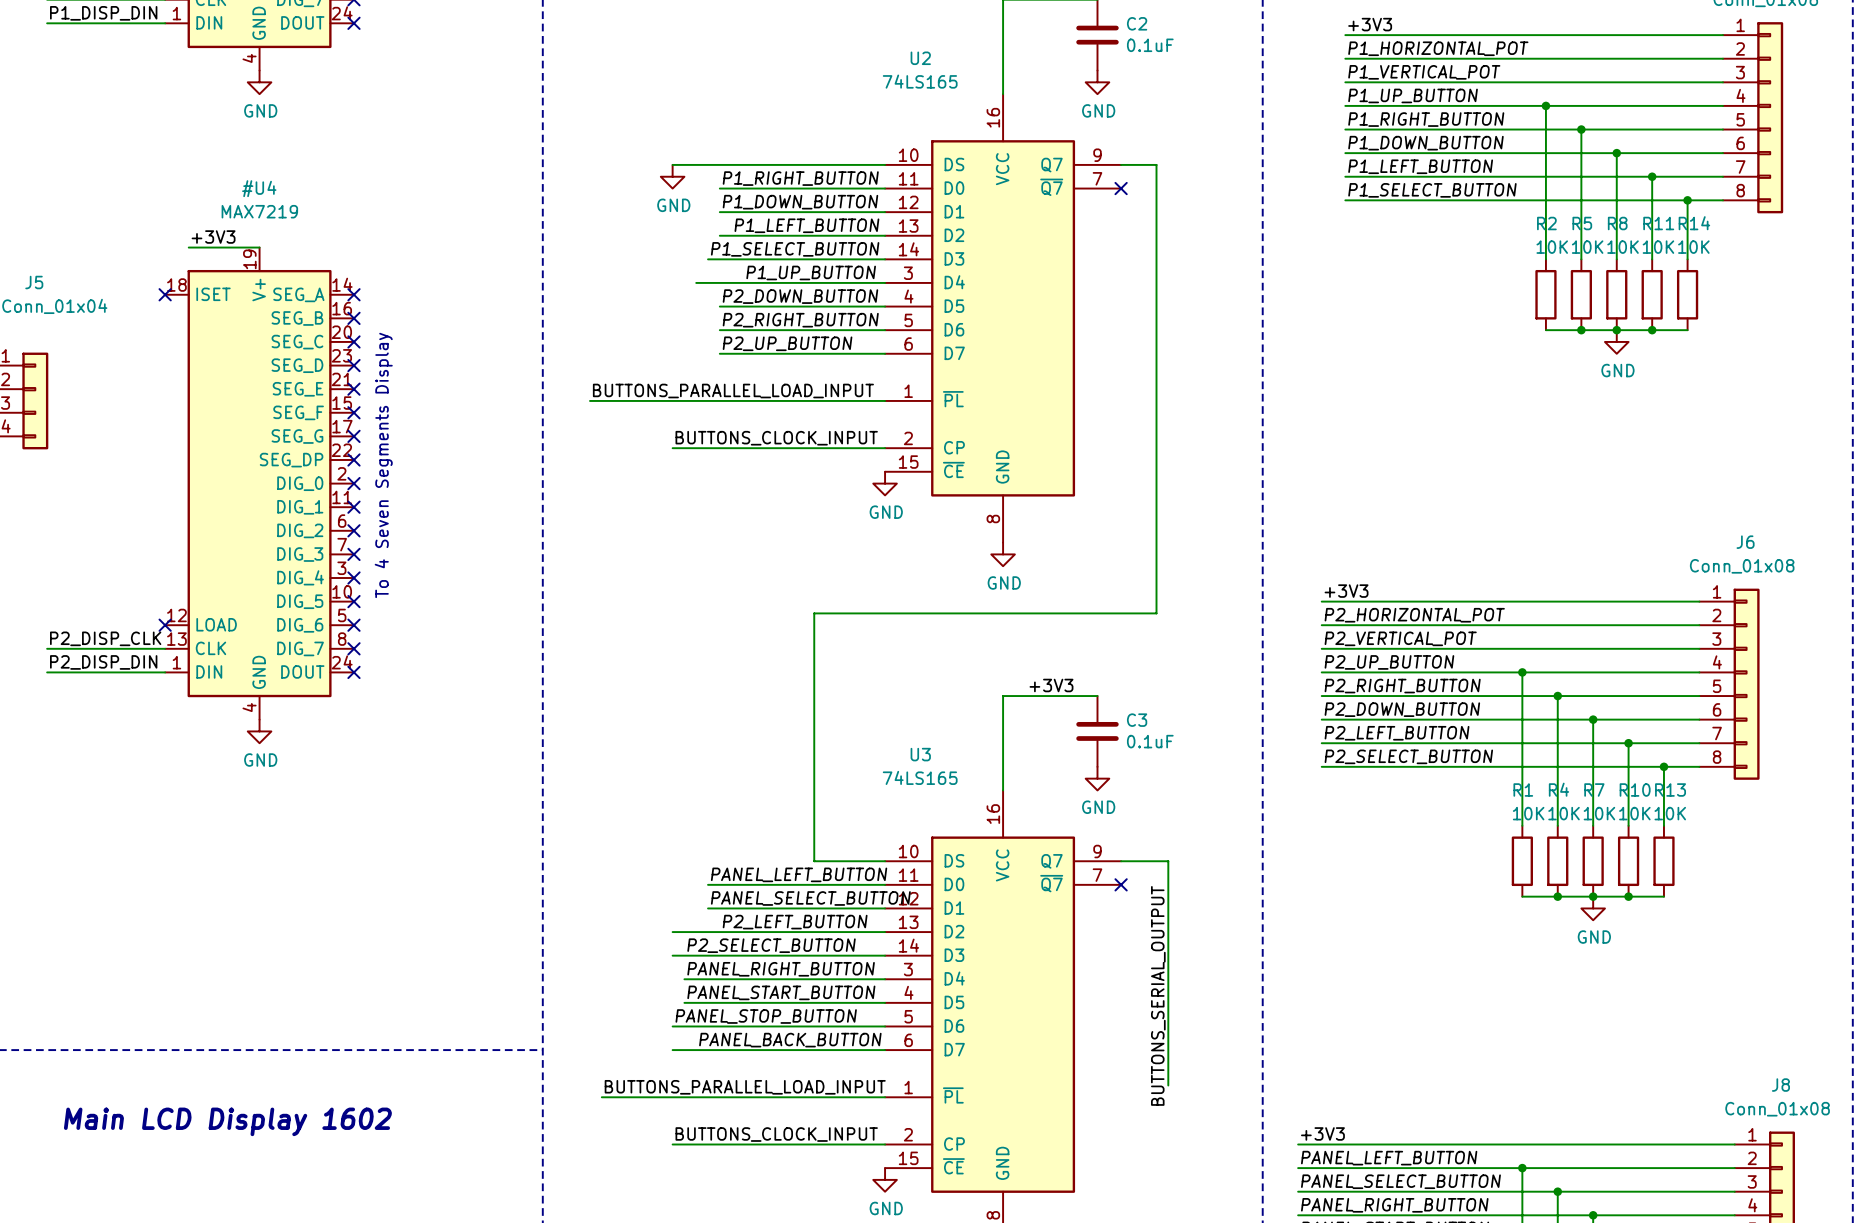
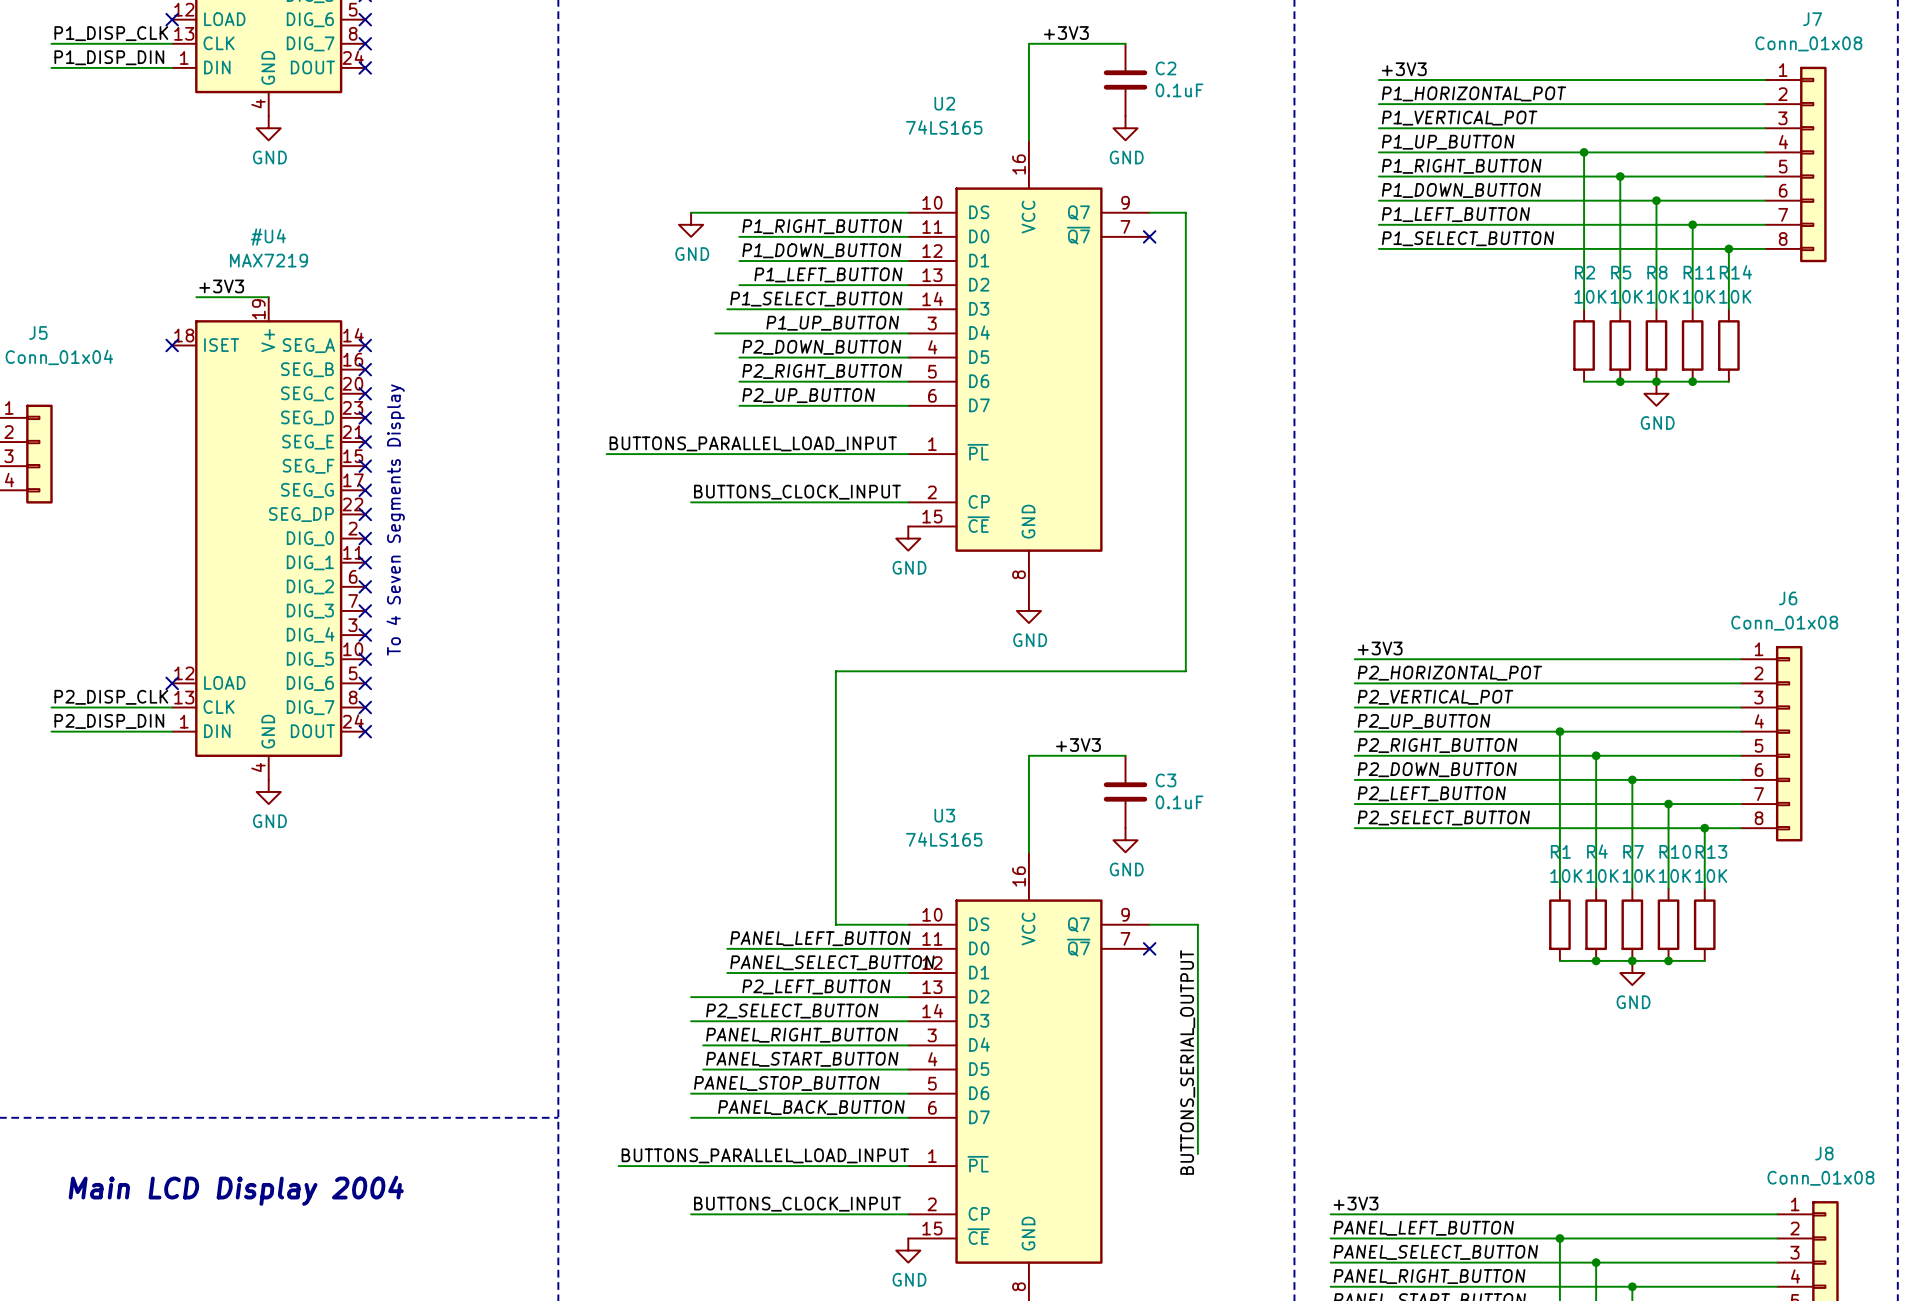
text: Main LCD Display 1602 (227, 1121) -> Main LCD Display 2004 (236, 1190)

